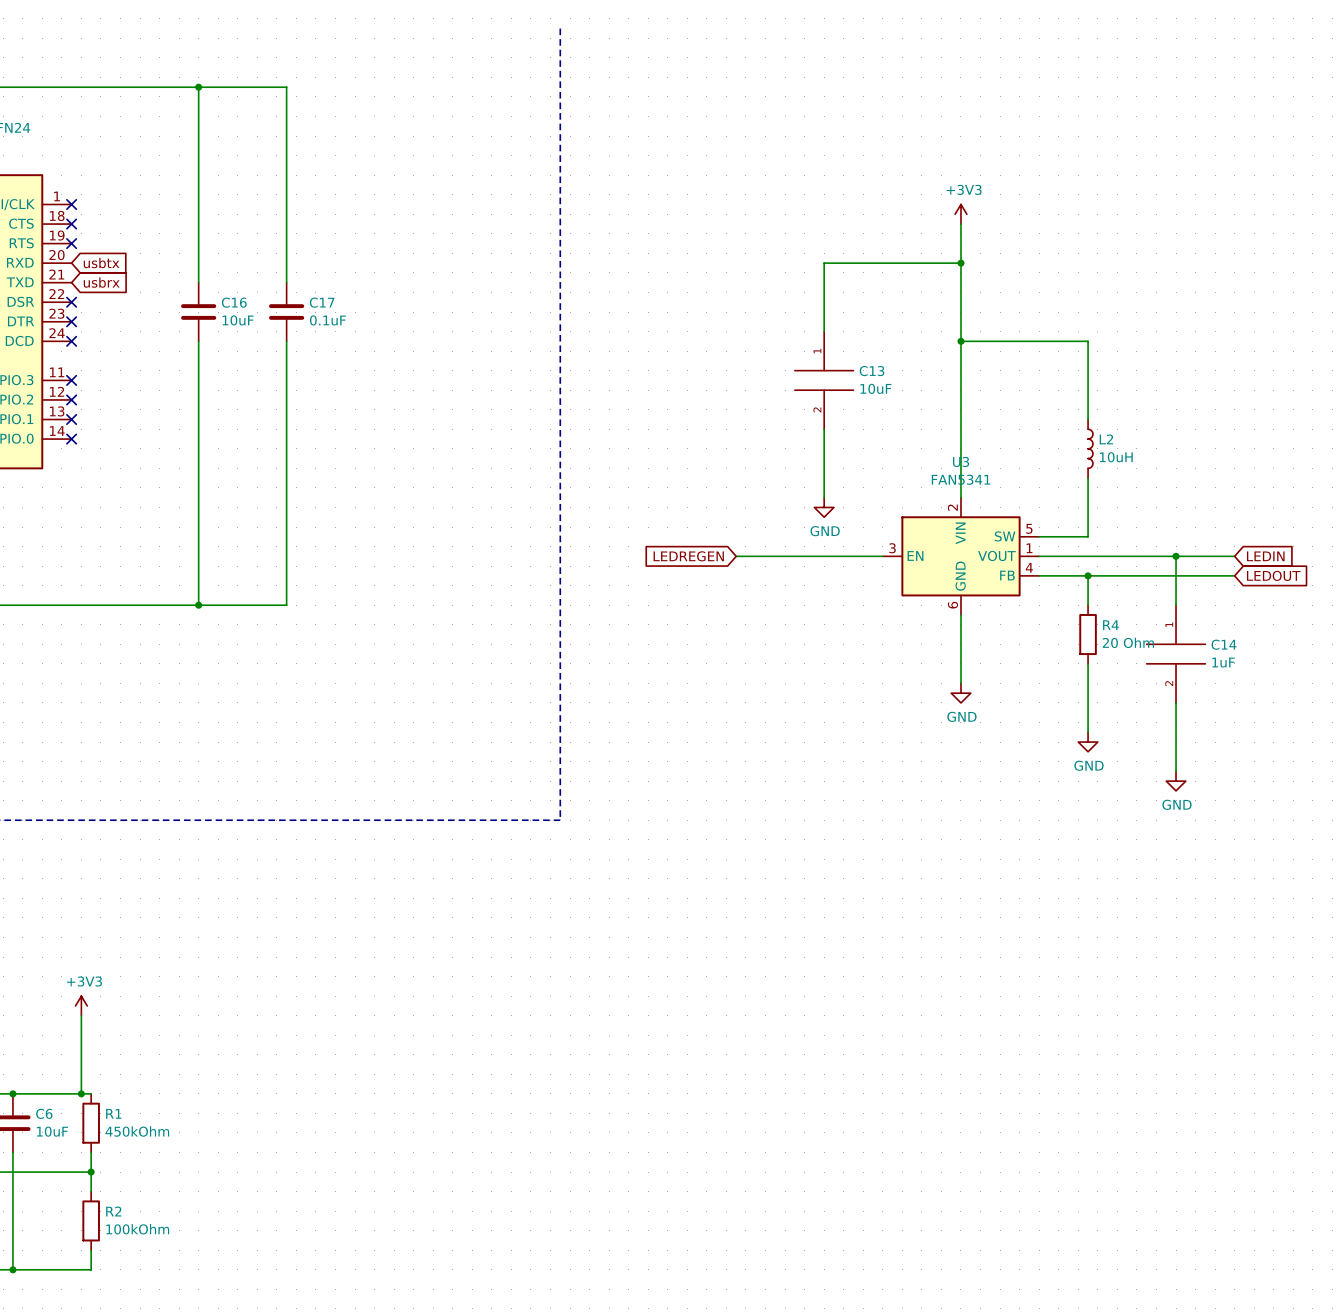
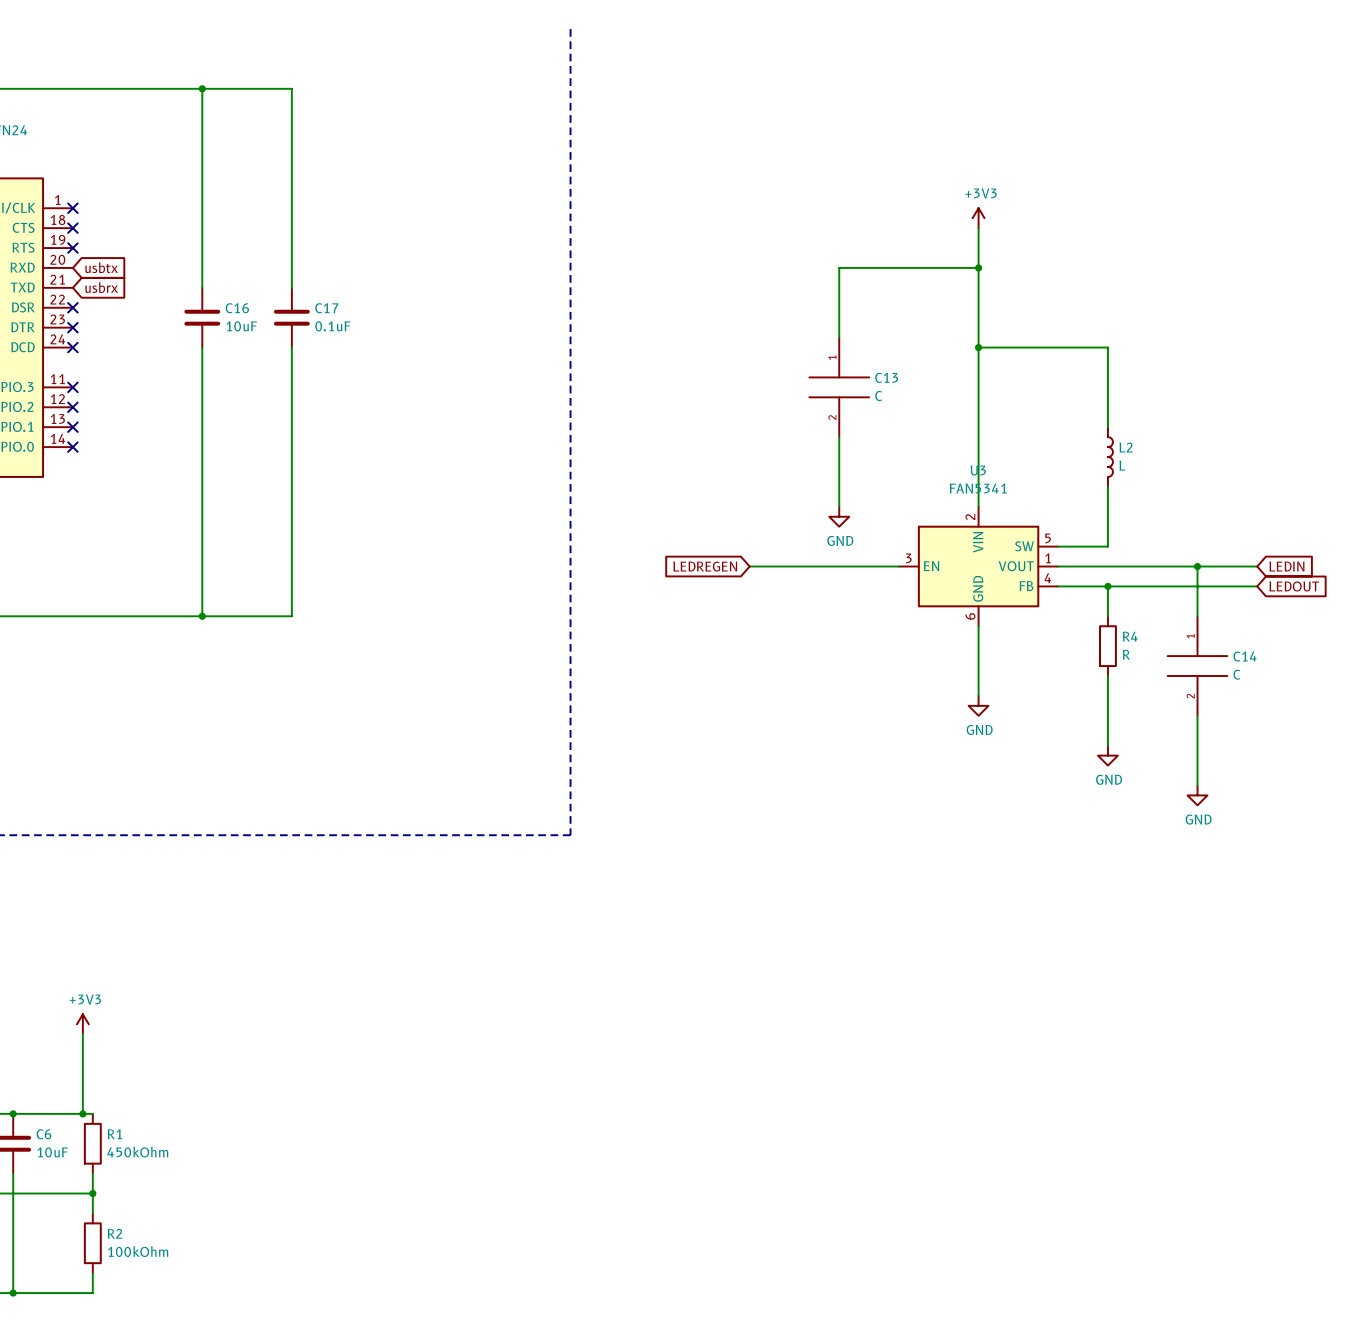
C13 value: 10uF (875, 388) -> C (878, 396)
L2 value: 10uH (1116, 457) -> L (1122, 465)
R4 value: 20 Ohm (1128, 642) -> R (1126, 654)
C14 value: 1uF (1223, 662) -> C (1236, 674)

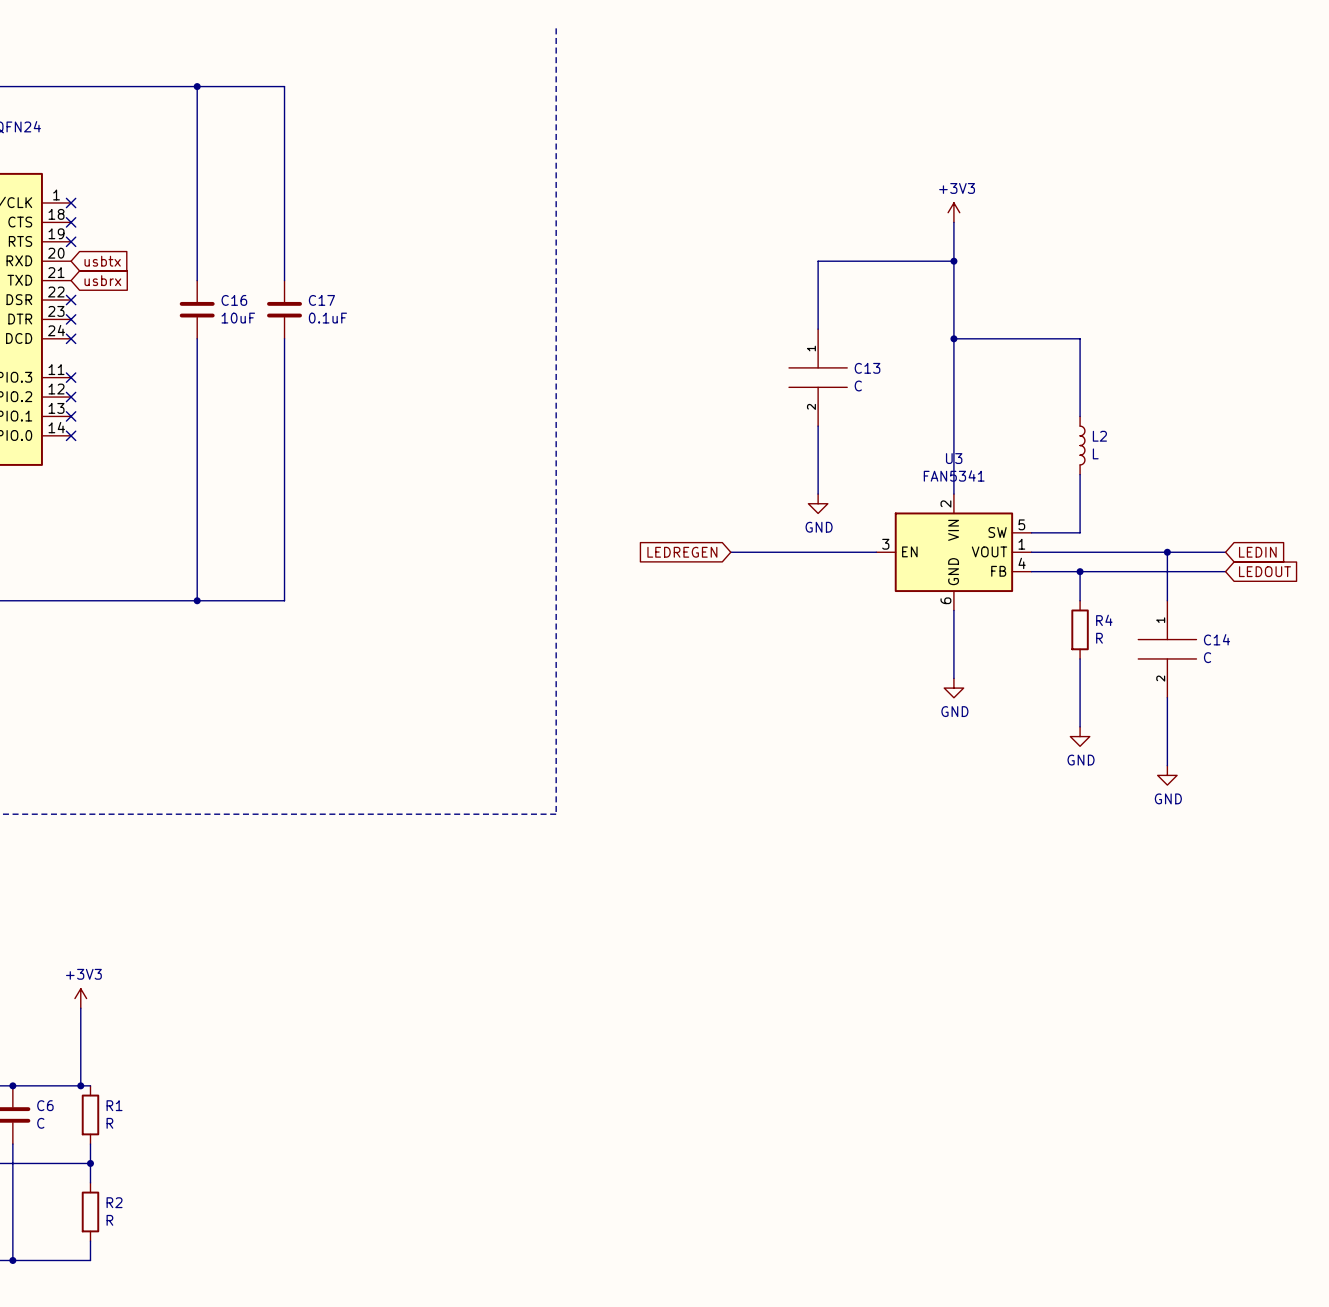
C6 value: 10uF (52, 1152) -> C (40, 1123)
R1 value: 450kOhm (137, 1152) -> R (109, 1123)
R2 value: 100kOhm (138, 1251) -> R (109, 1220)

